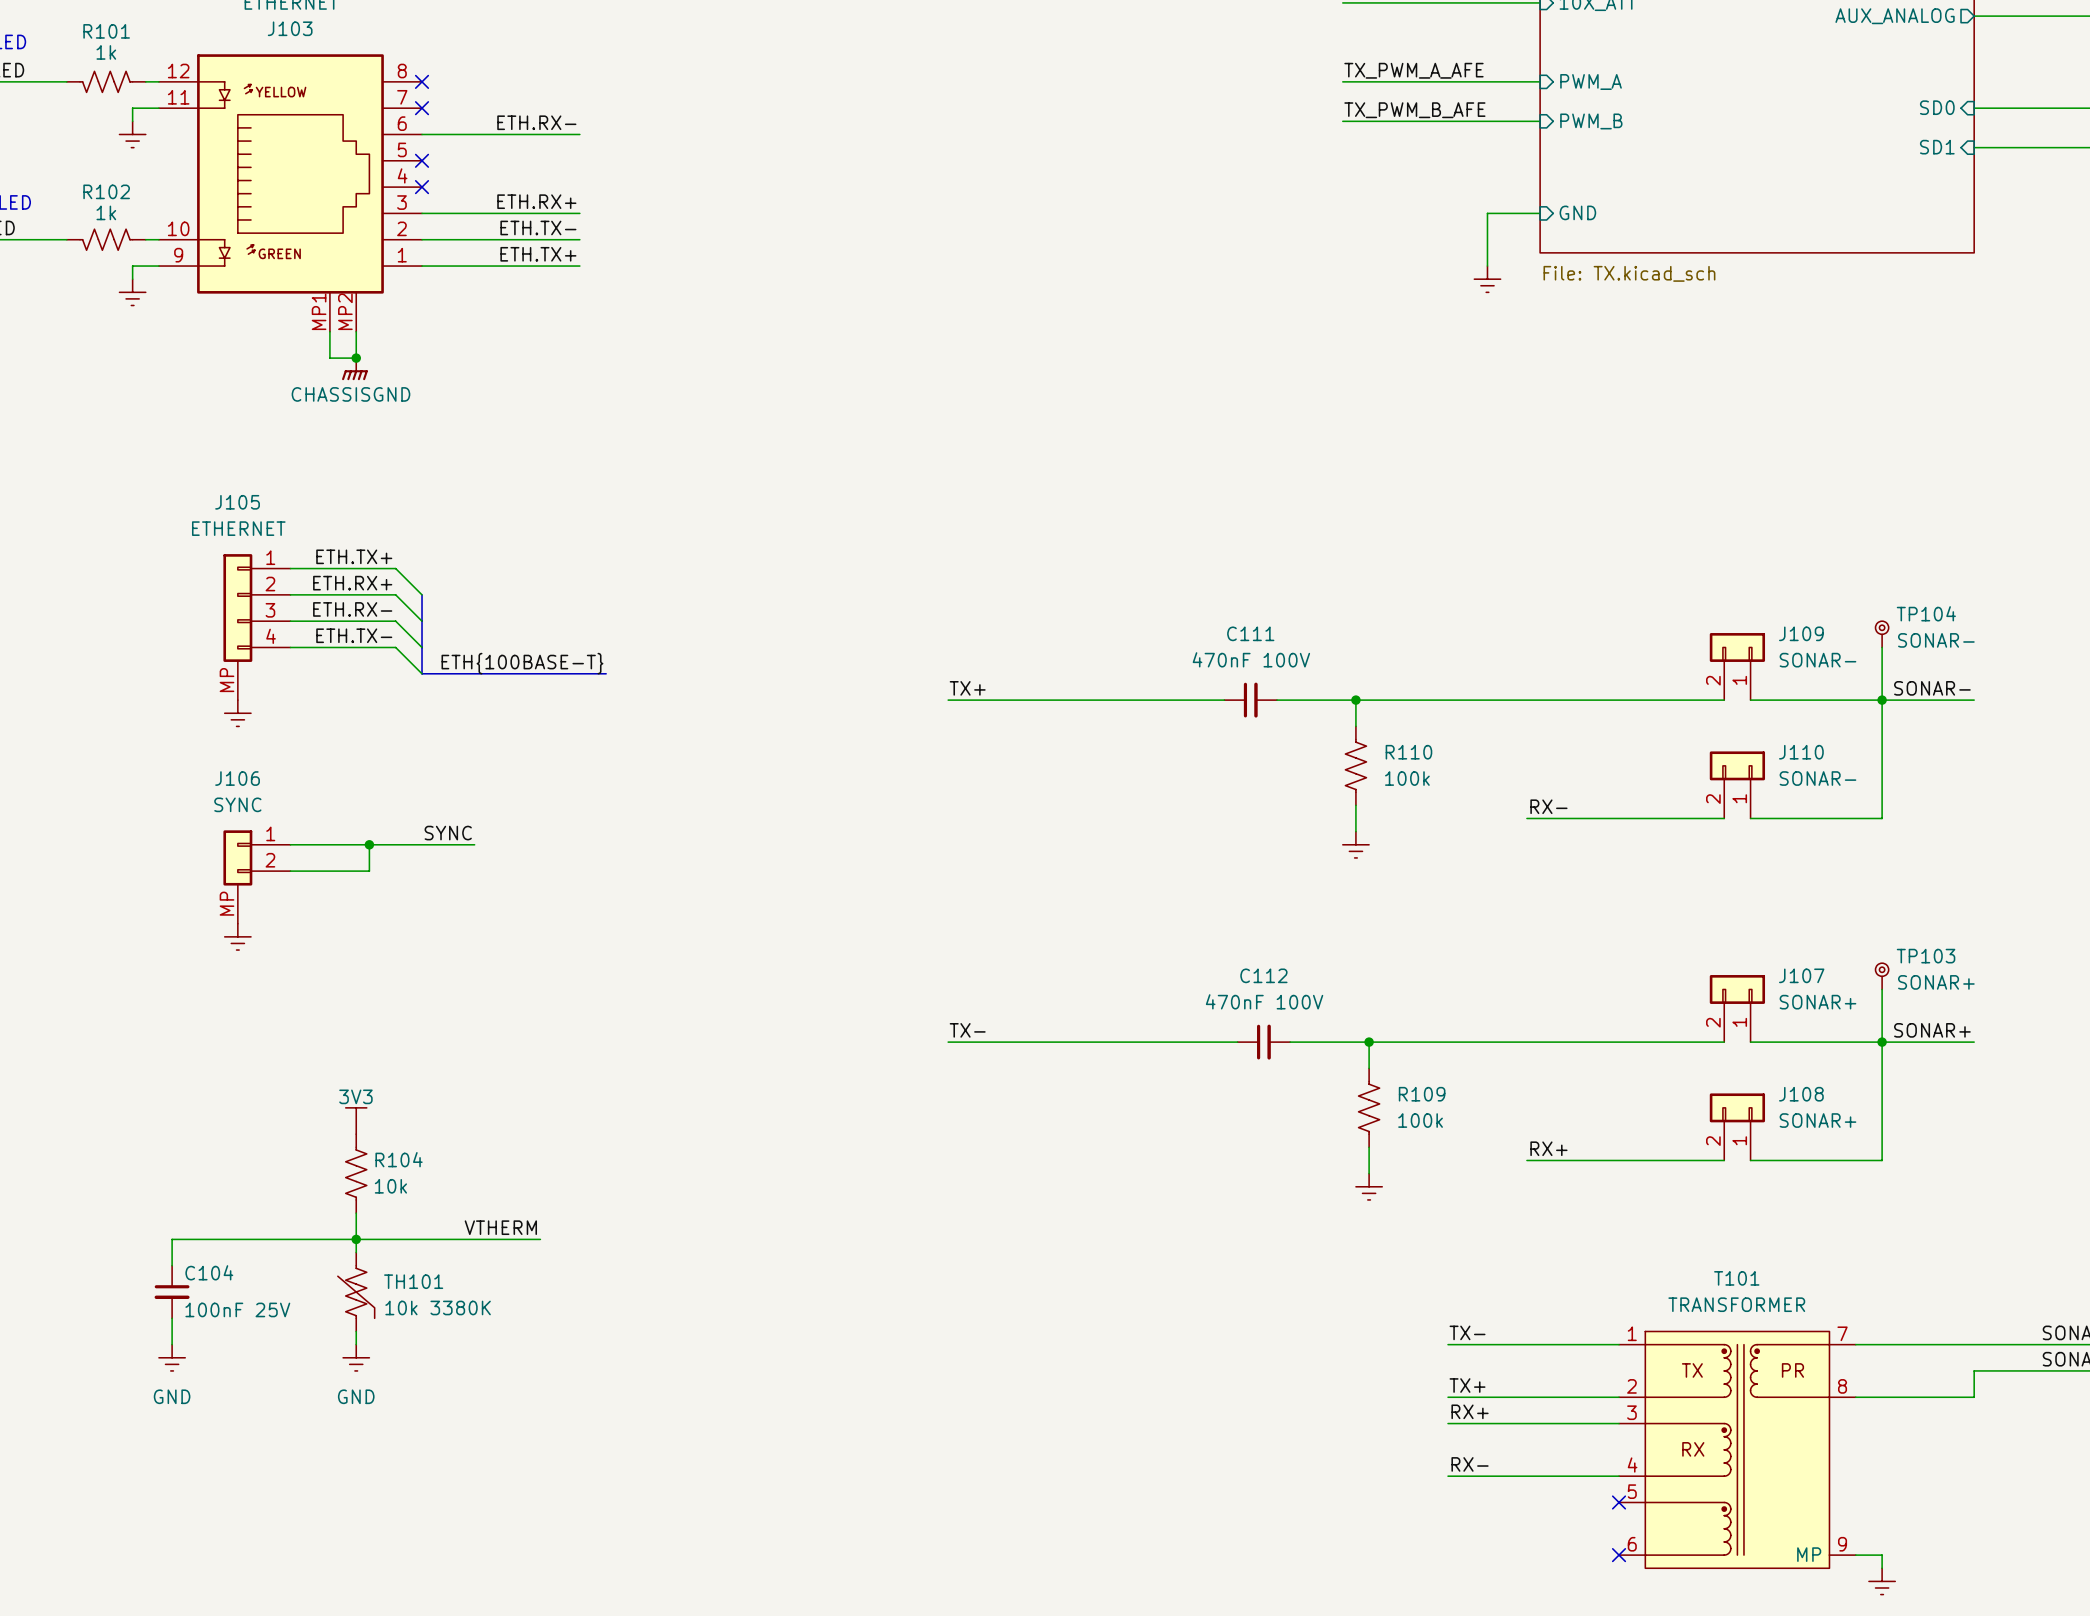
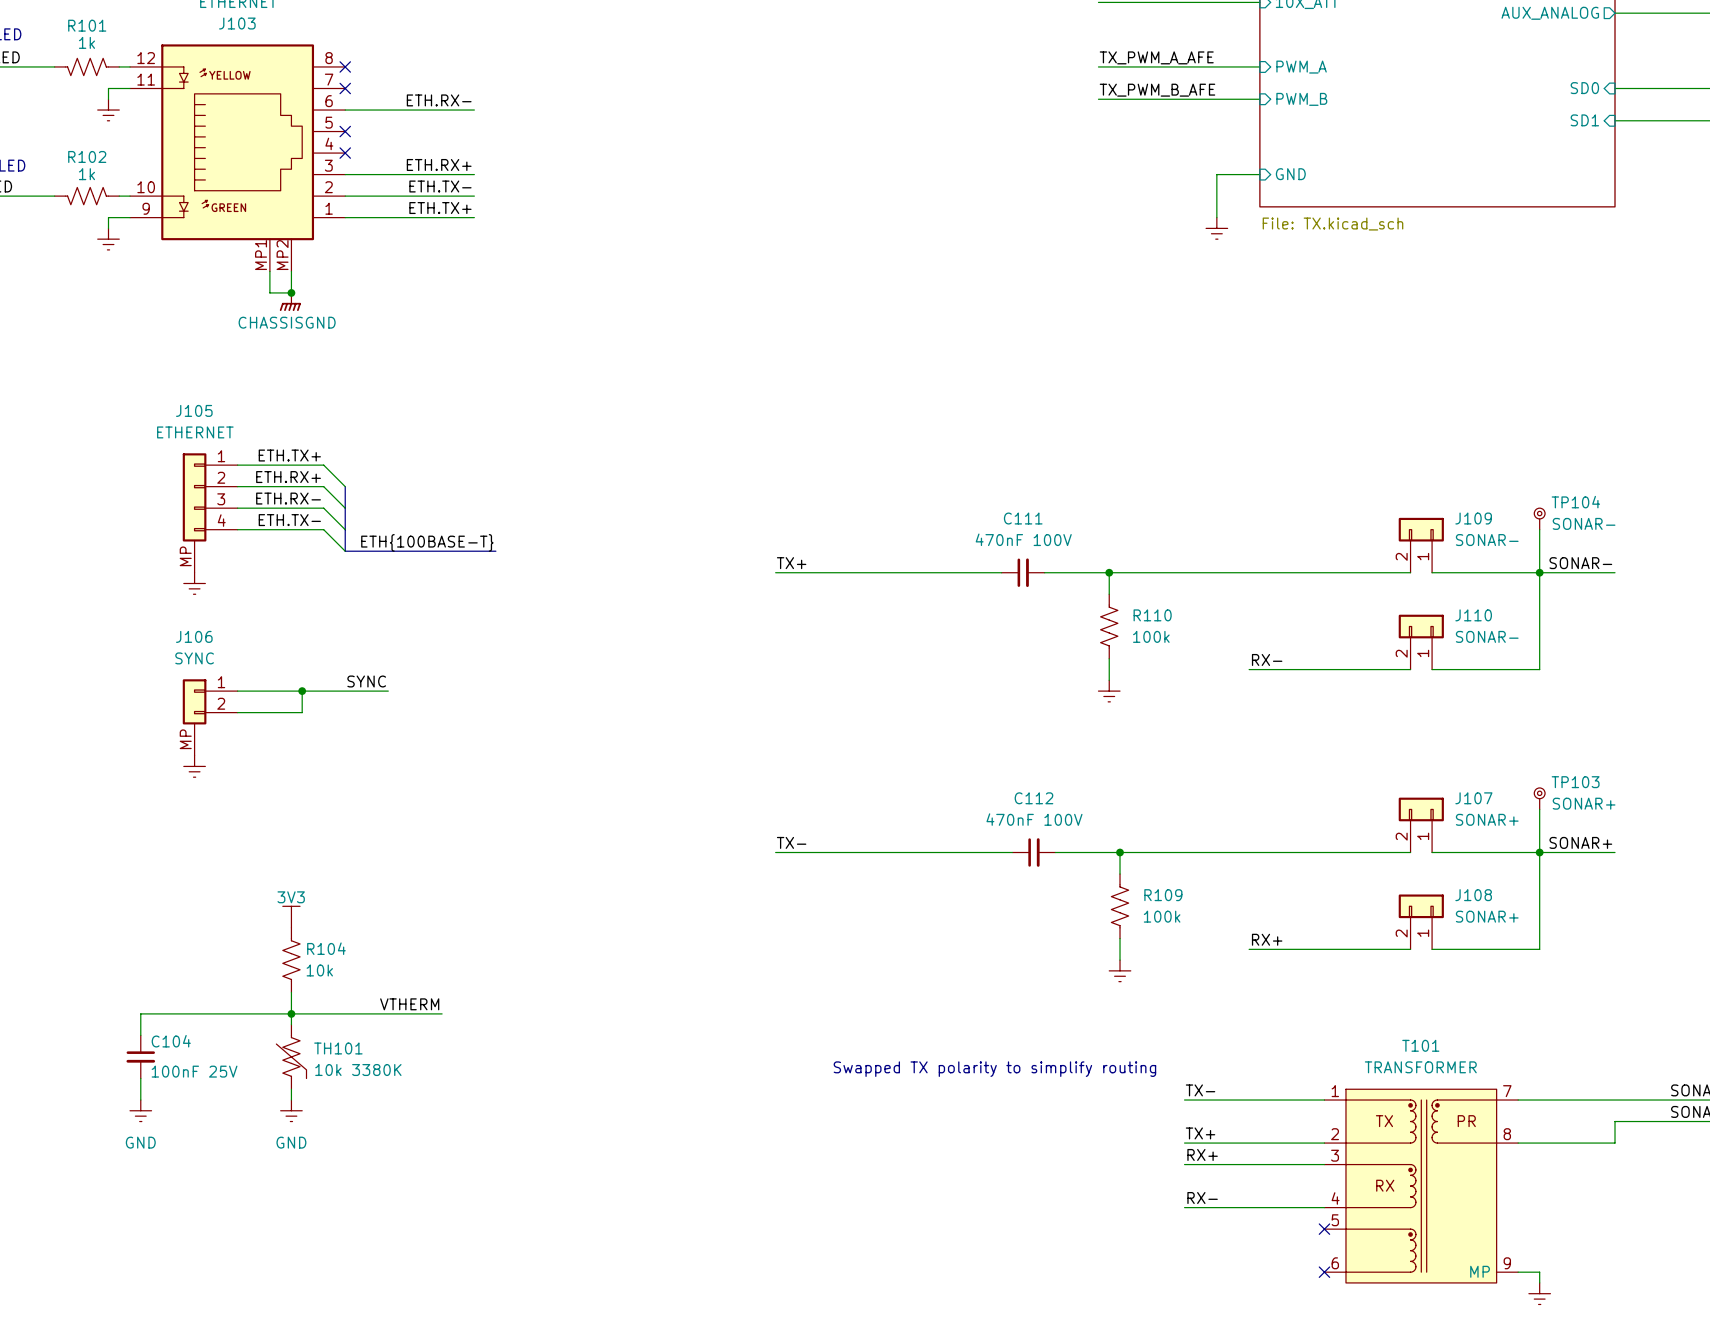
text: none -> Swapped TX polarity to simplify routing (994, 1069)

